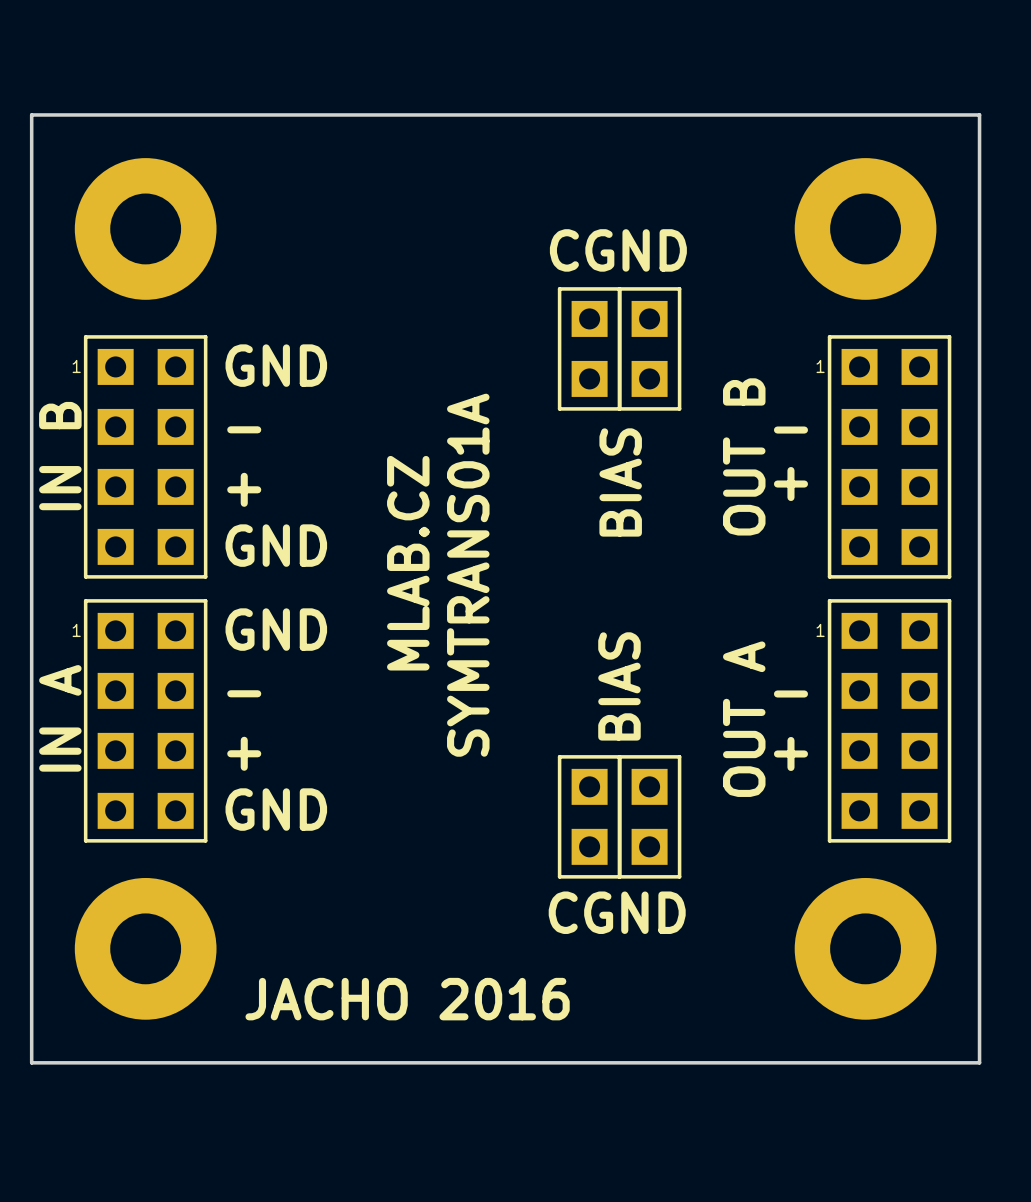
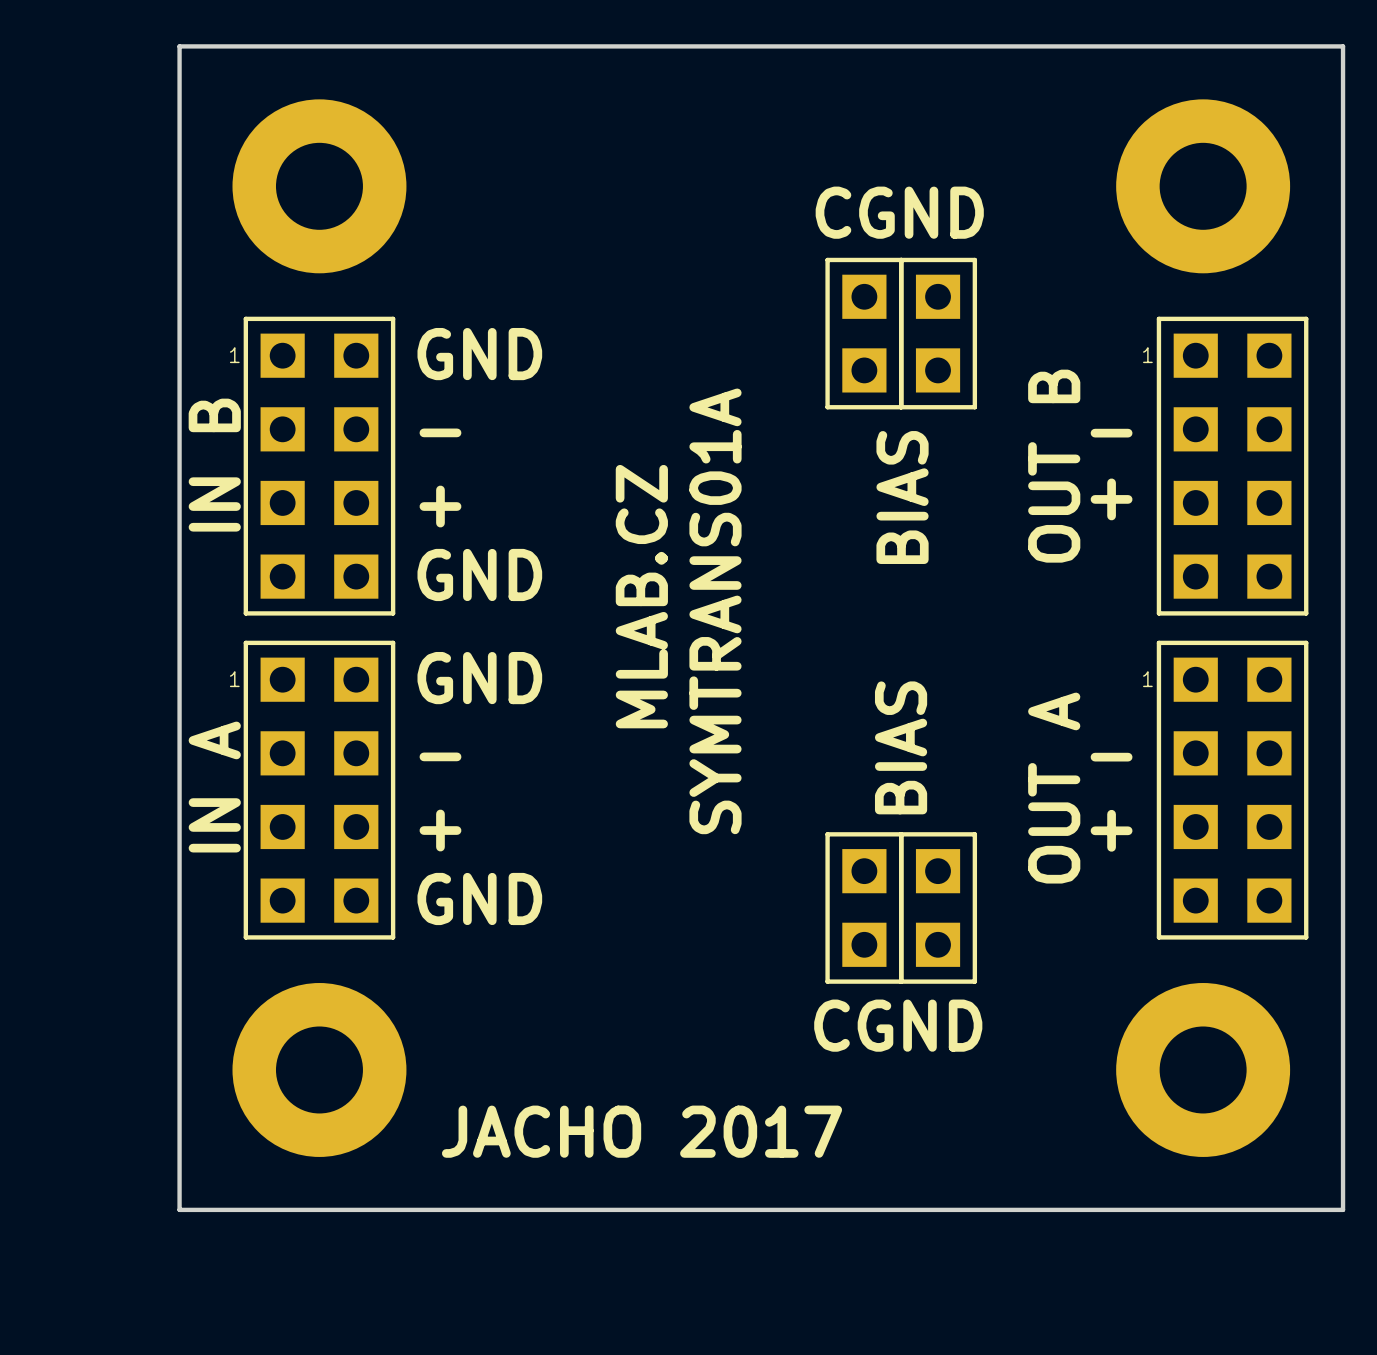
text: JACHO 2016 (407, 999) -> JACHO 2017 (642, 1131)

